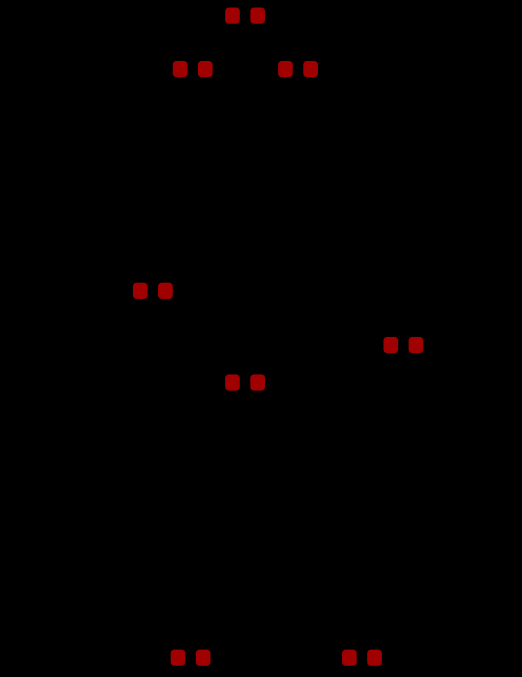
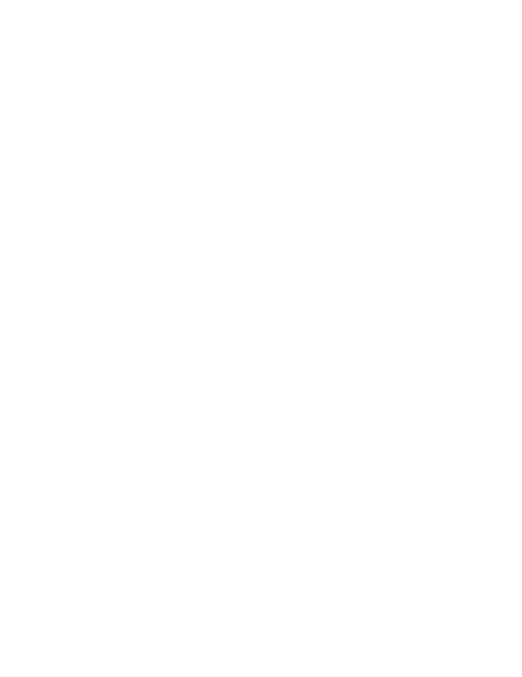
part: (245, 15) -> none
part: (192, 69) -> none
part: (298, 69) -> none
part: (152, 290) -> none
part: (403, 345) -> none
part: (245, 382) -> none
part: (190, 657) -> none
part: (361, 657) -> none

